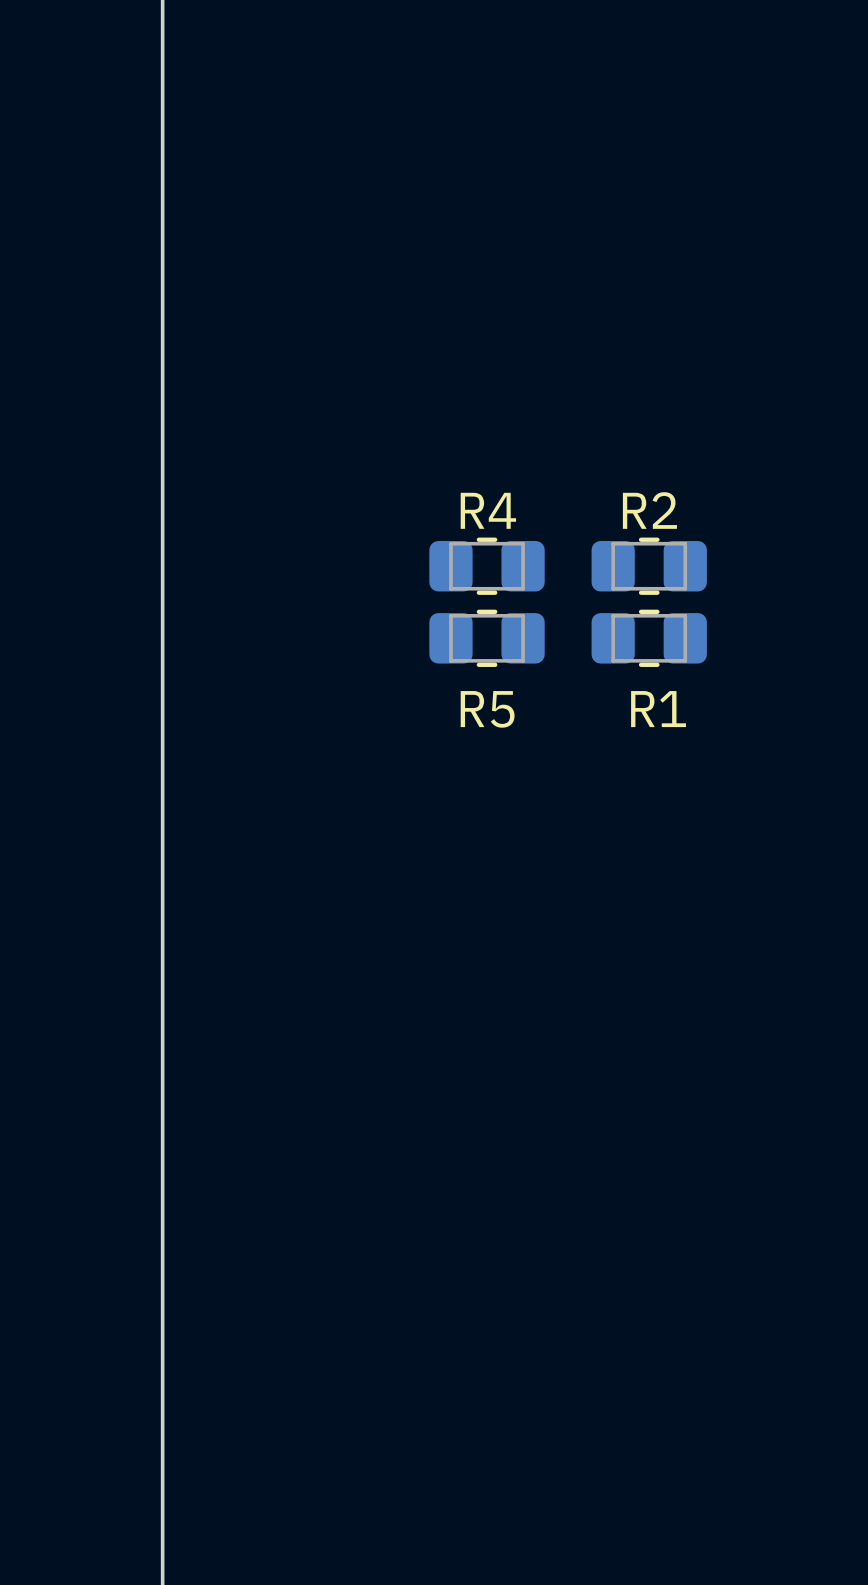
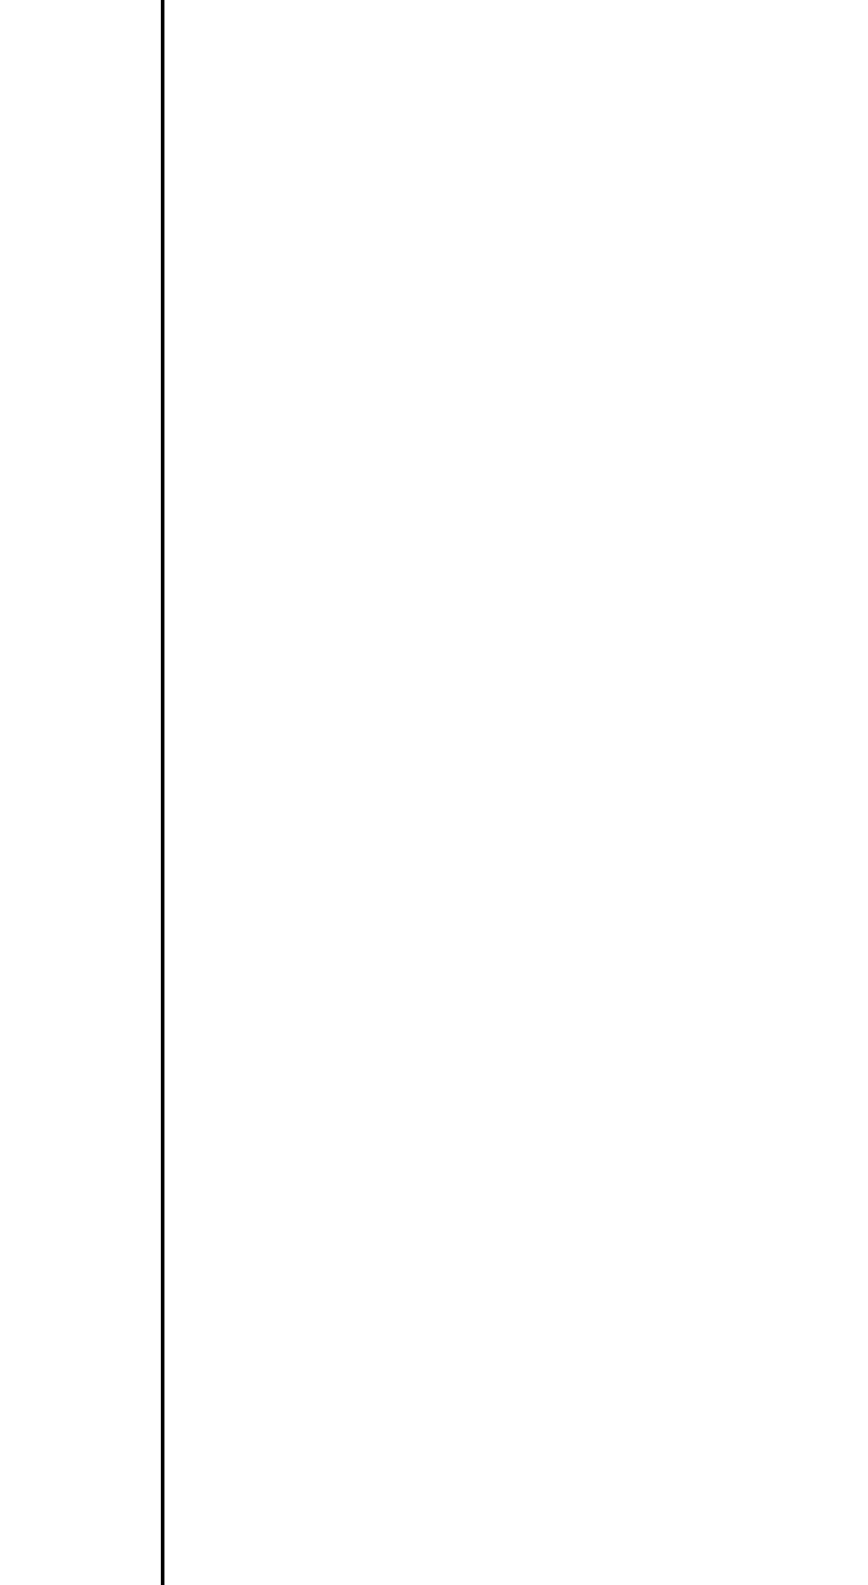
R5: (487, 566) -> none
R2: (649, 566) -> none
R4: (487, 638) -> none
R1: (649, 638) -> none

